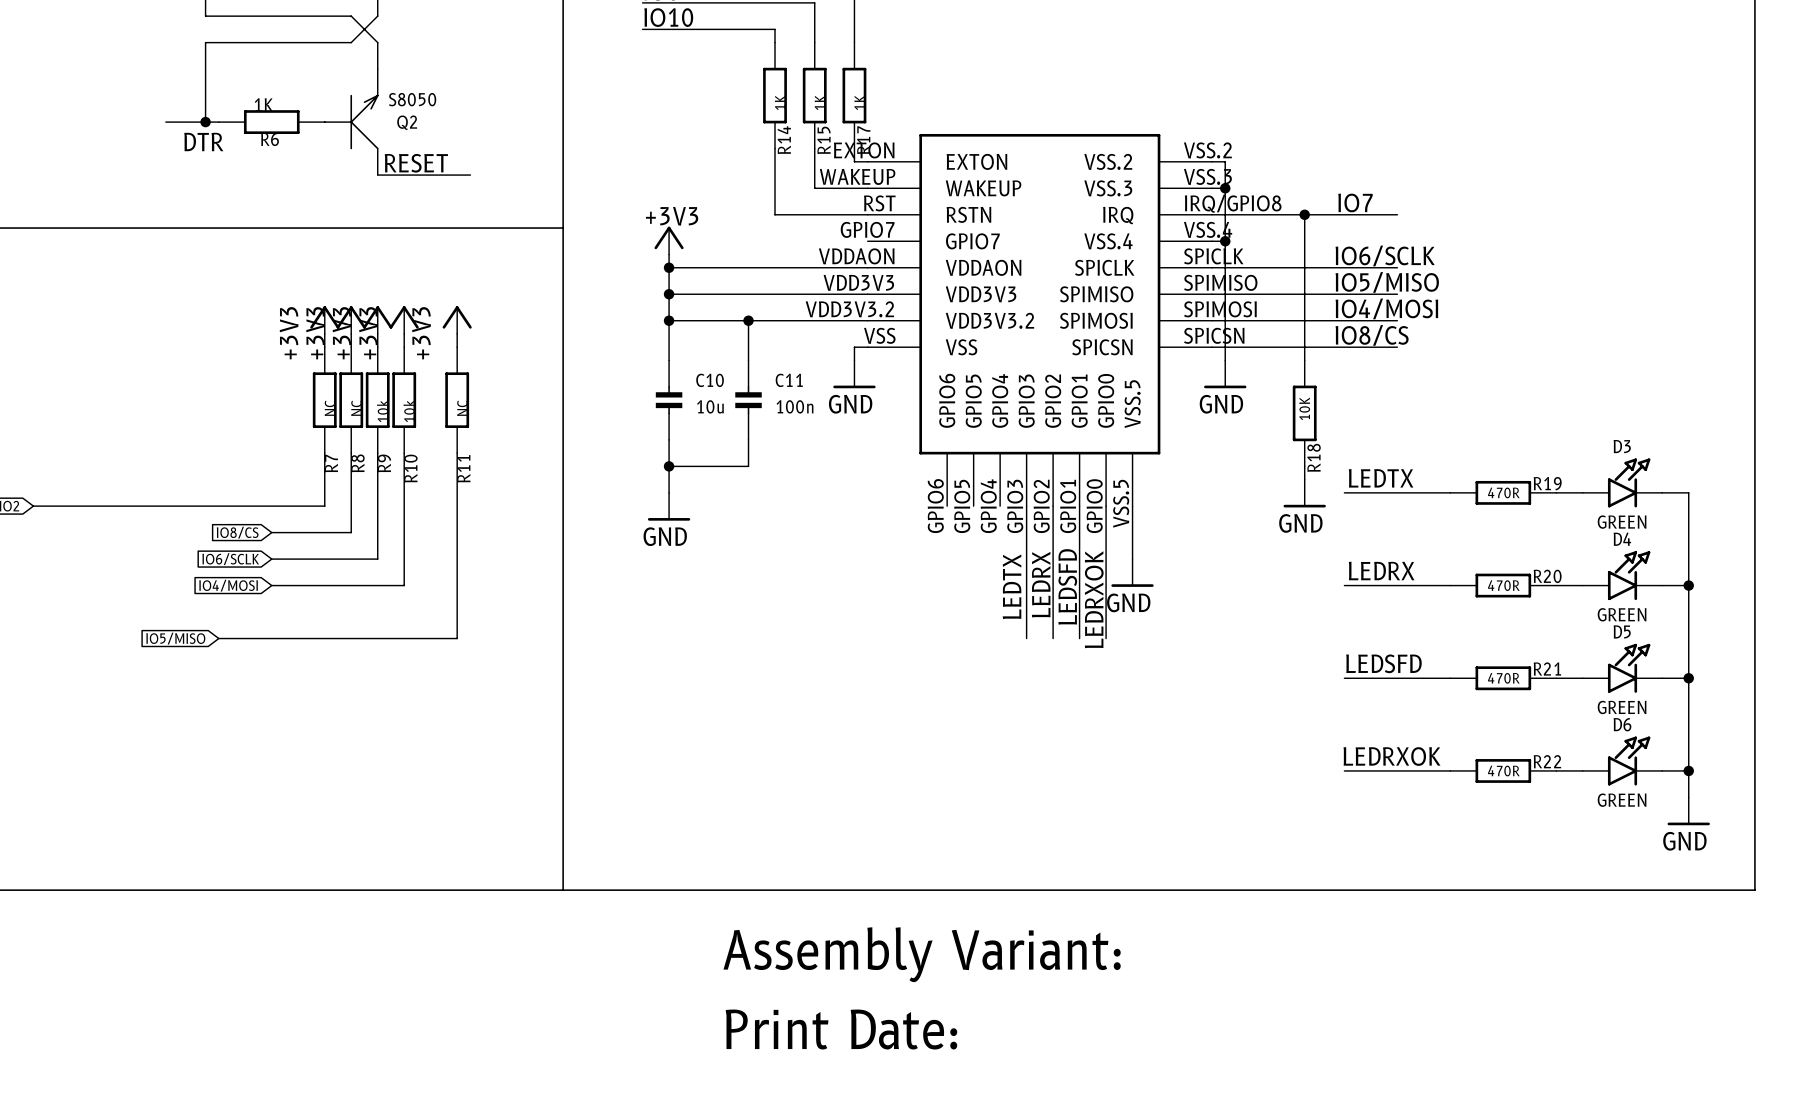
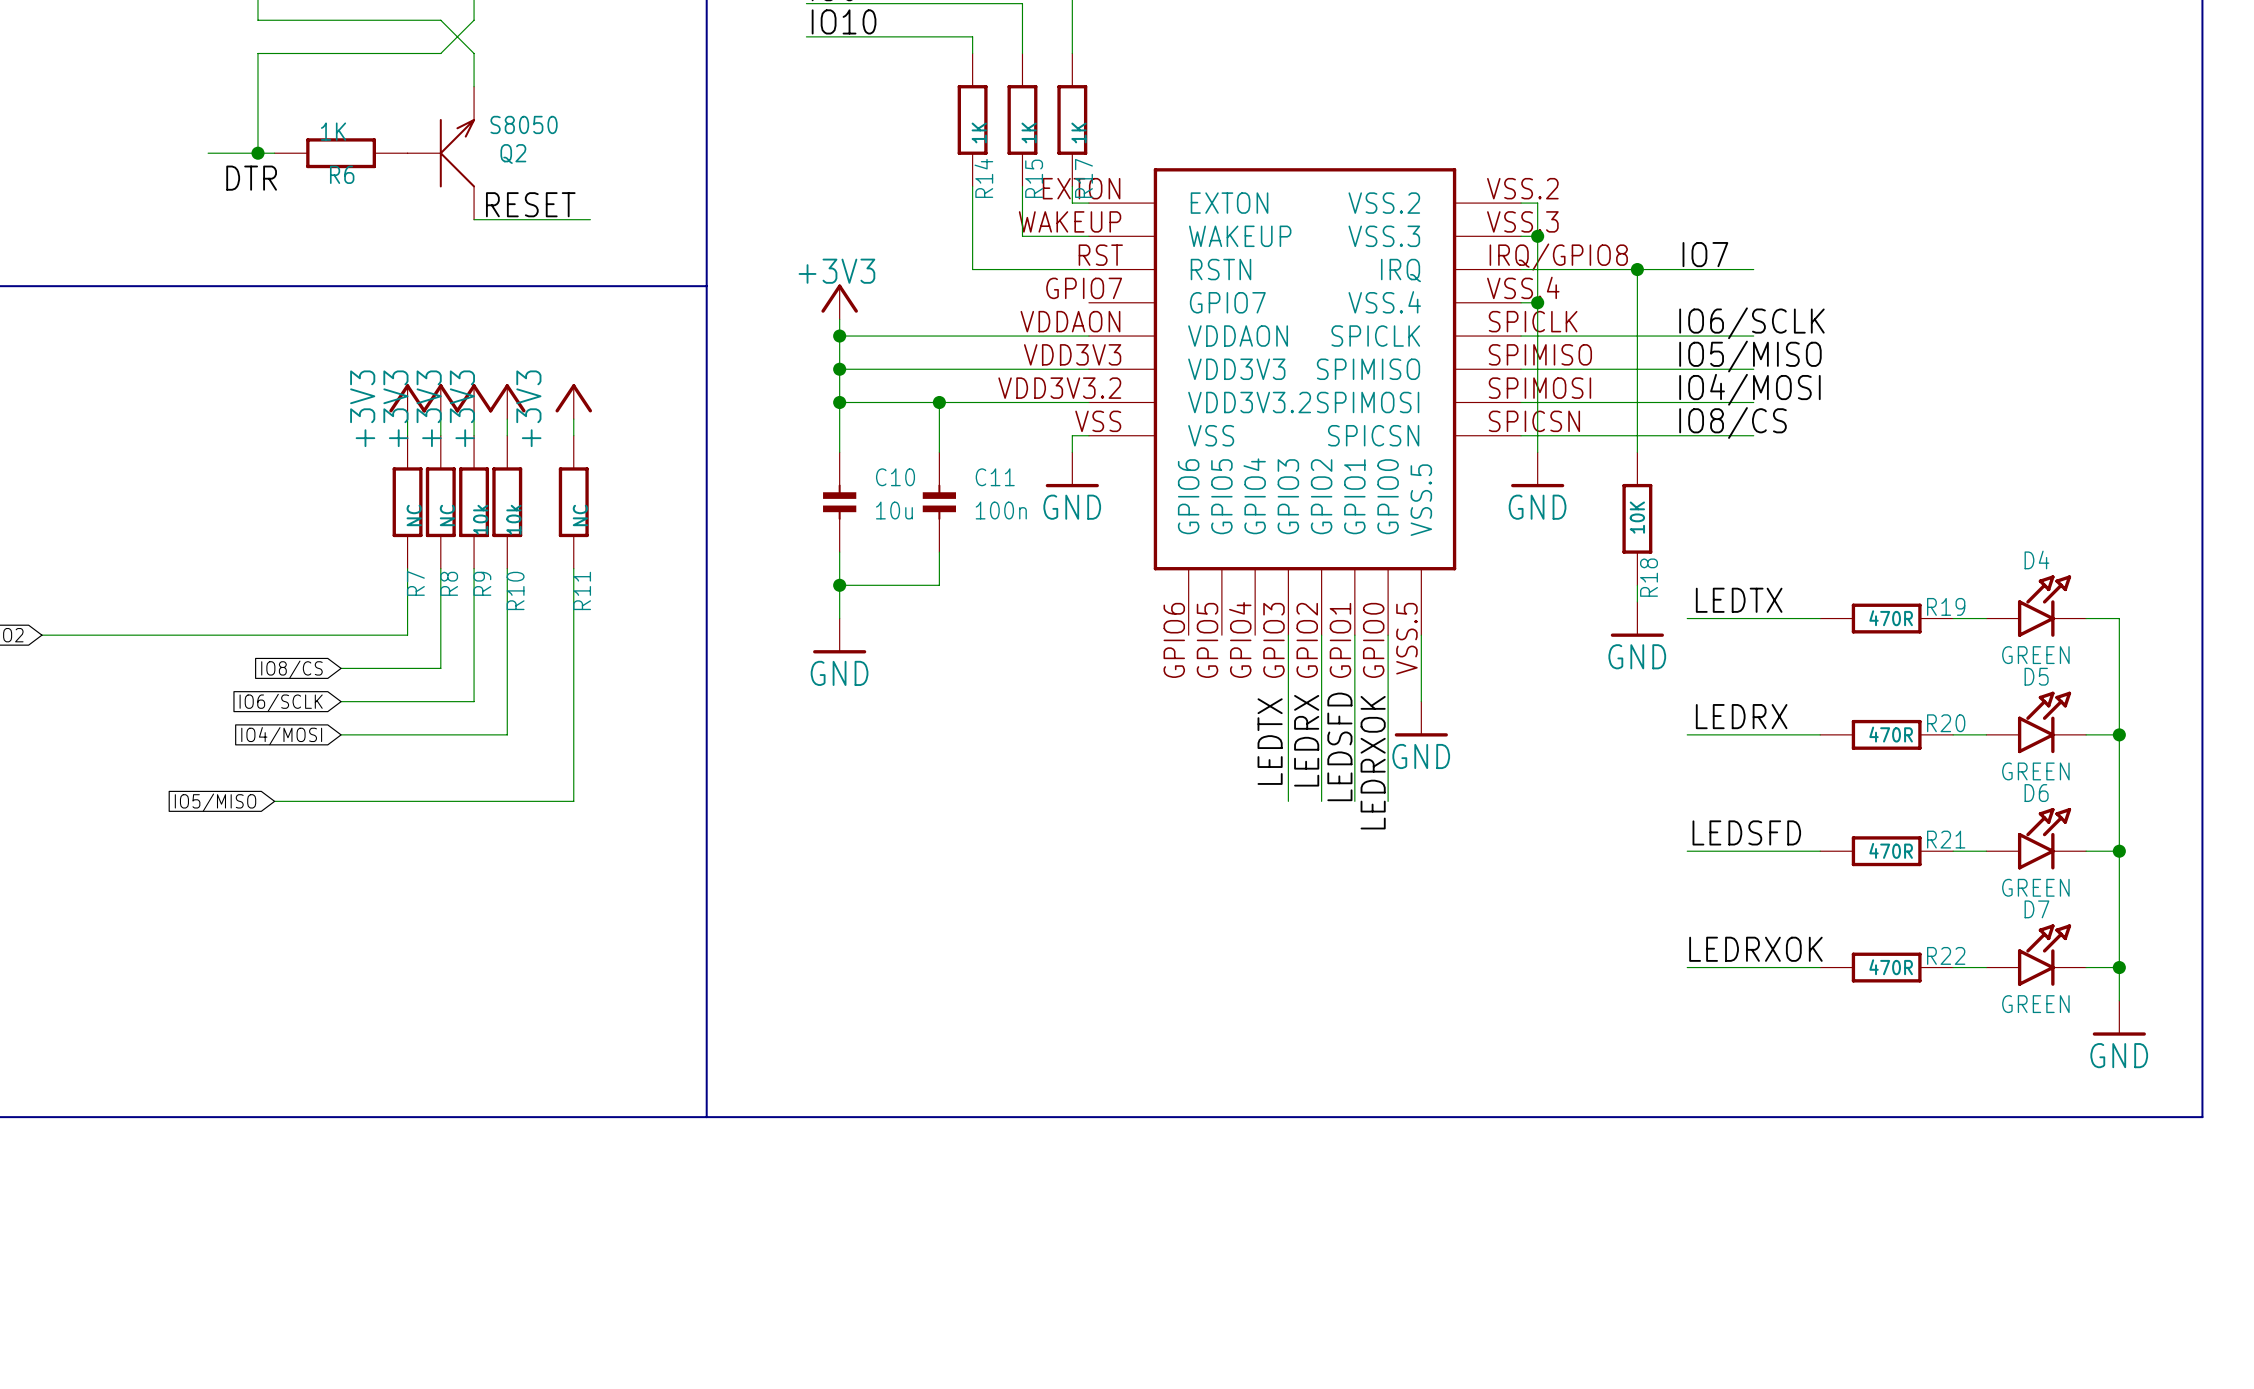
D3 name: D3 (1622, 446) -> D4 (2036, 559)
D4 name: D4 (1622, 539) -> D5 (2036, 676)
D5 name: D5 (1622, 631) -> D6 (2036, 793)
D6 name: D6 (1622, 724) -> D7 (2036, 909)
text: Assembly Variant: (922, 954) -> none
text: Print Date: (841, 1029) -> none

